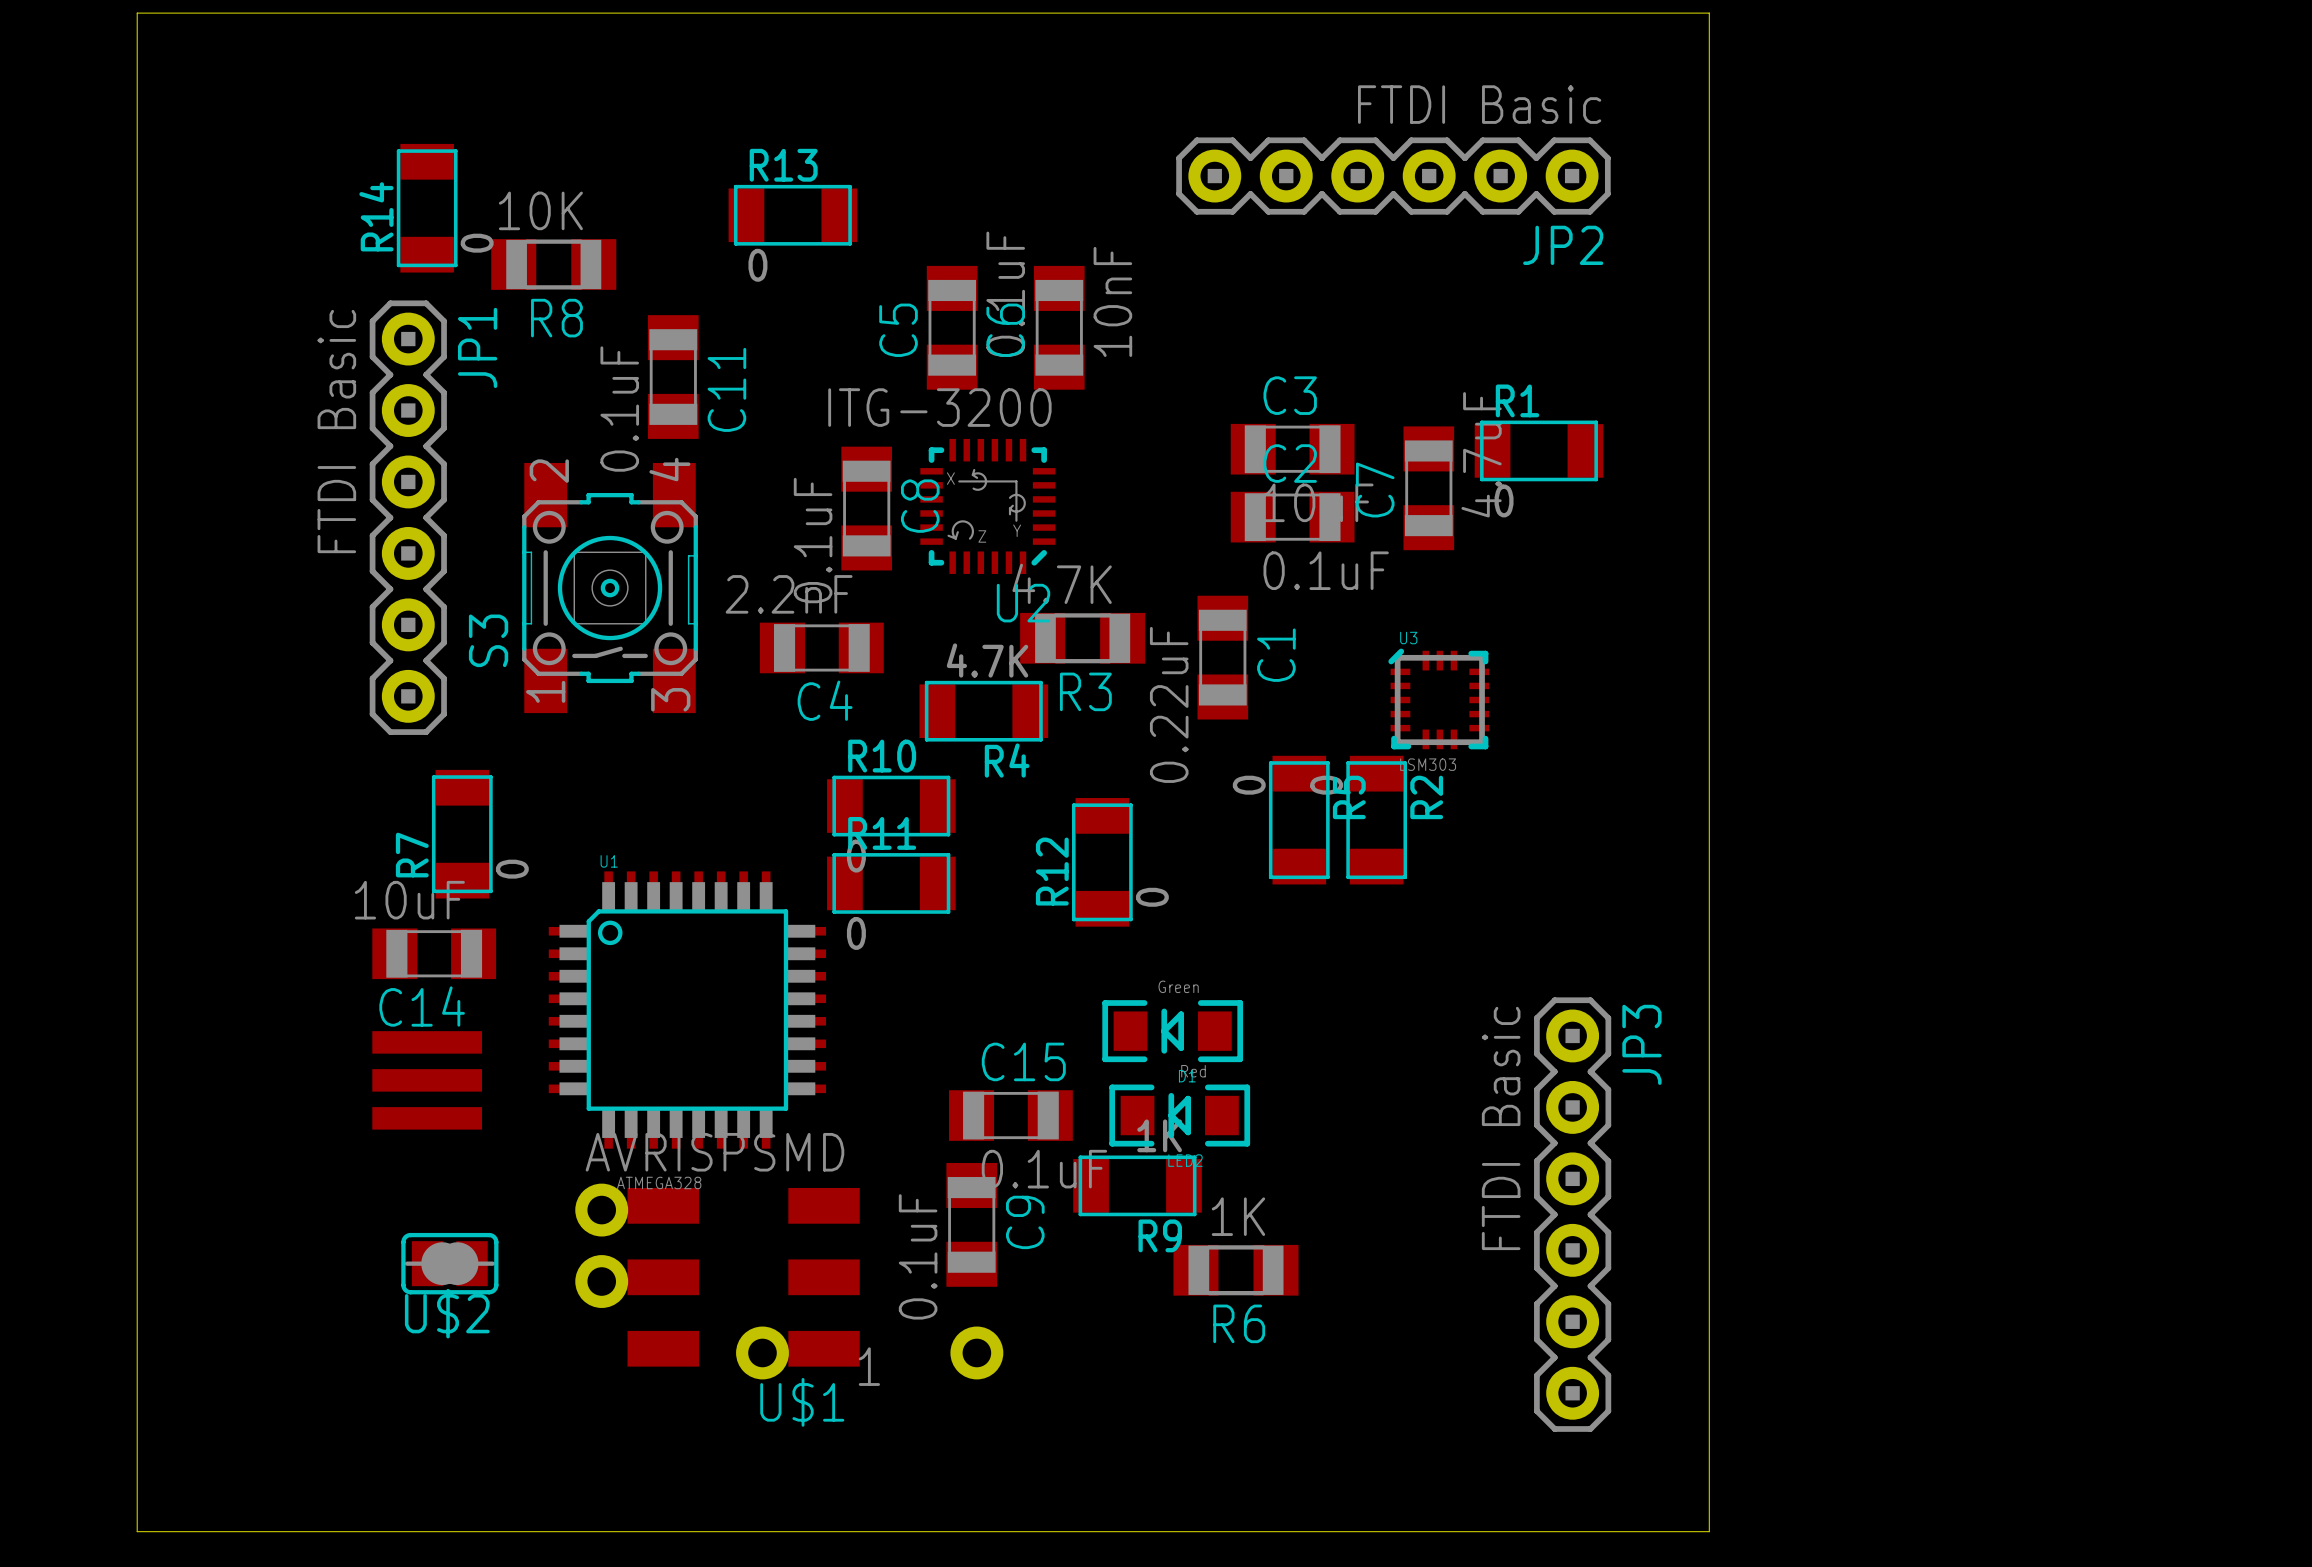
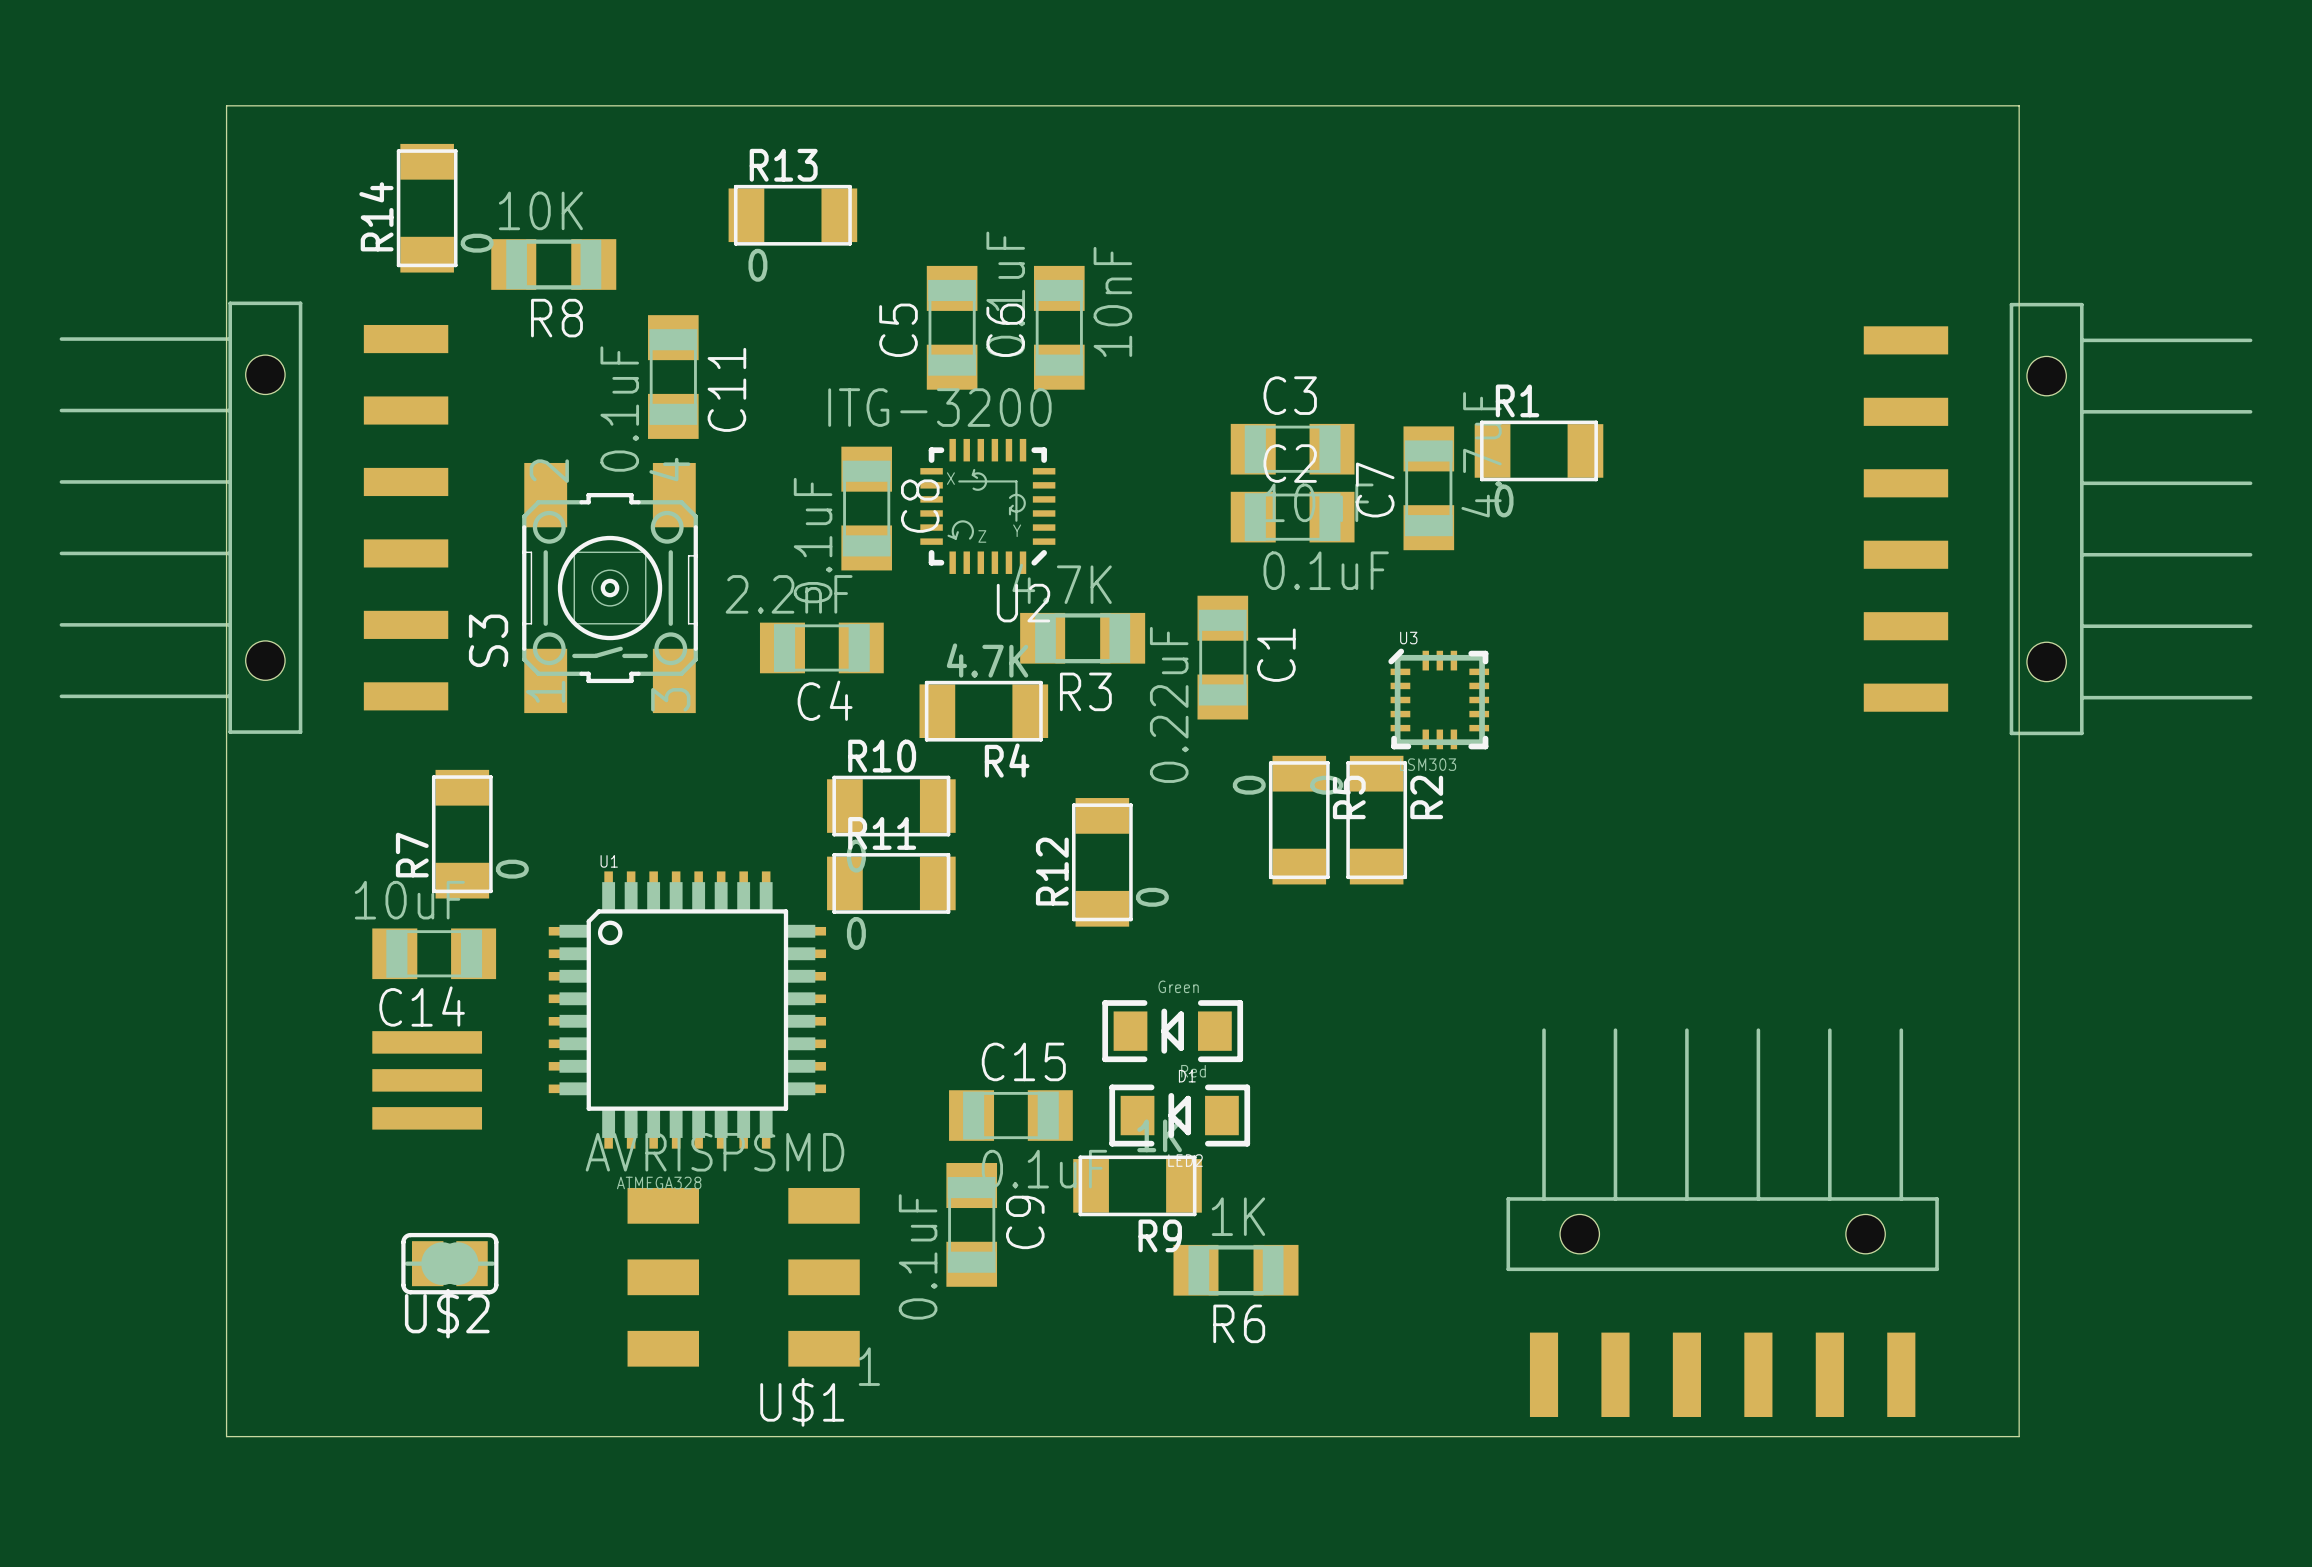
board edge: (137, 13) (1709, 13) (1709, 1531) (137, 1531) (137, 13) -> (226, 105) (226, 1436) (2019, 1436) (2019, 105) (226, 105)
JP2: FTDI Basic (1393, 176) -> none
part: none -> (253, 517)
JP1: FTDI Basic (408, 517) -> none
part: none -> (2058, 519)
part: (601, 1210) -> none
JP3: FTDI Basic (1572, 1214) -> none
part: none -> (1722, 1222)
part: (601, 1281) -> none
part: (762, 1352) -> none
part: (976, 1352) -> none

